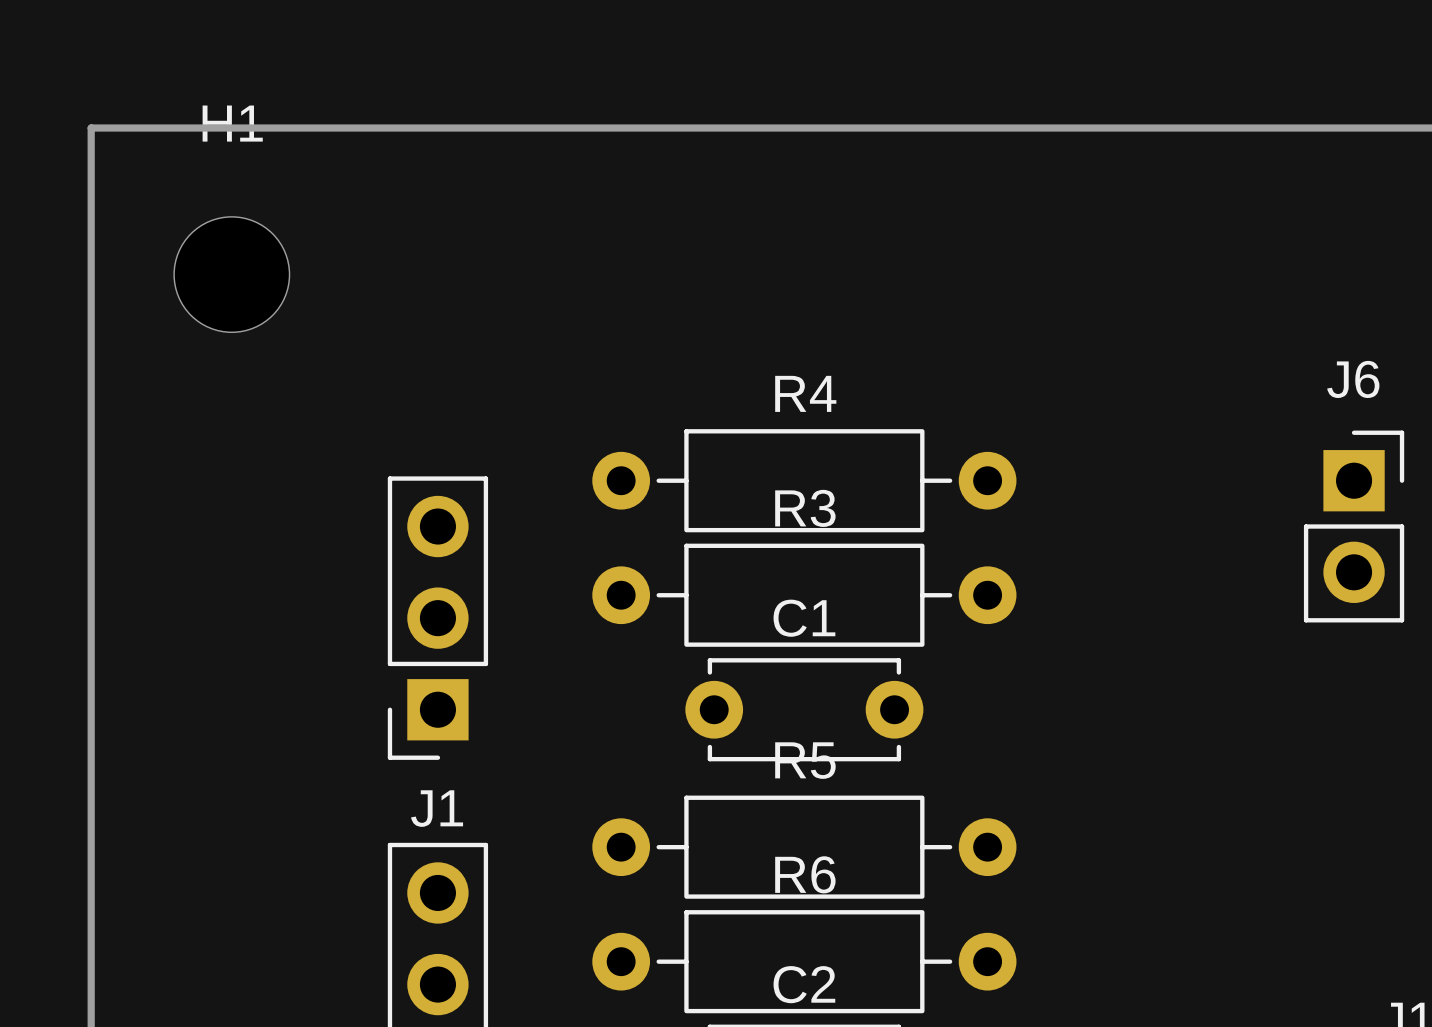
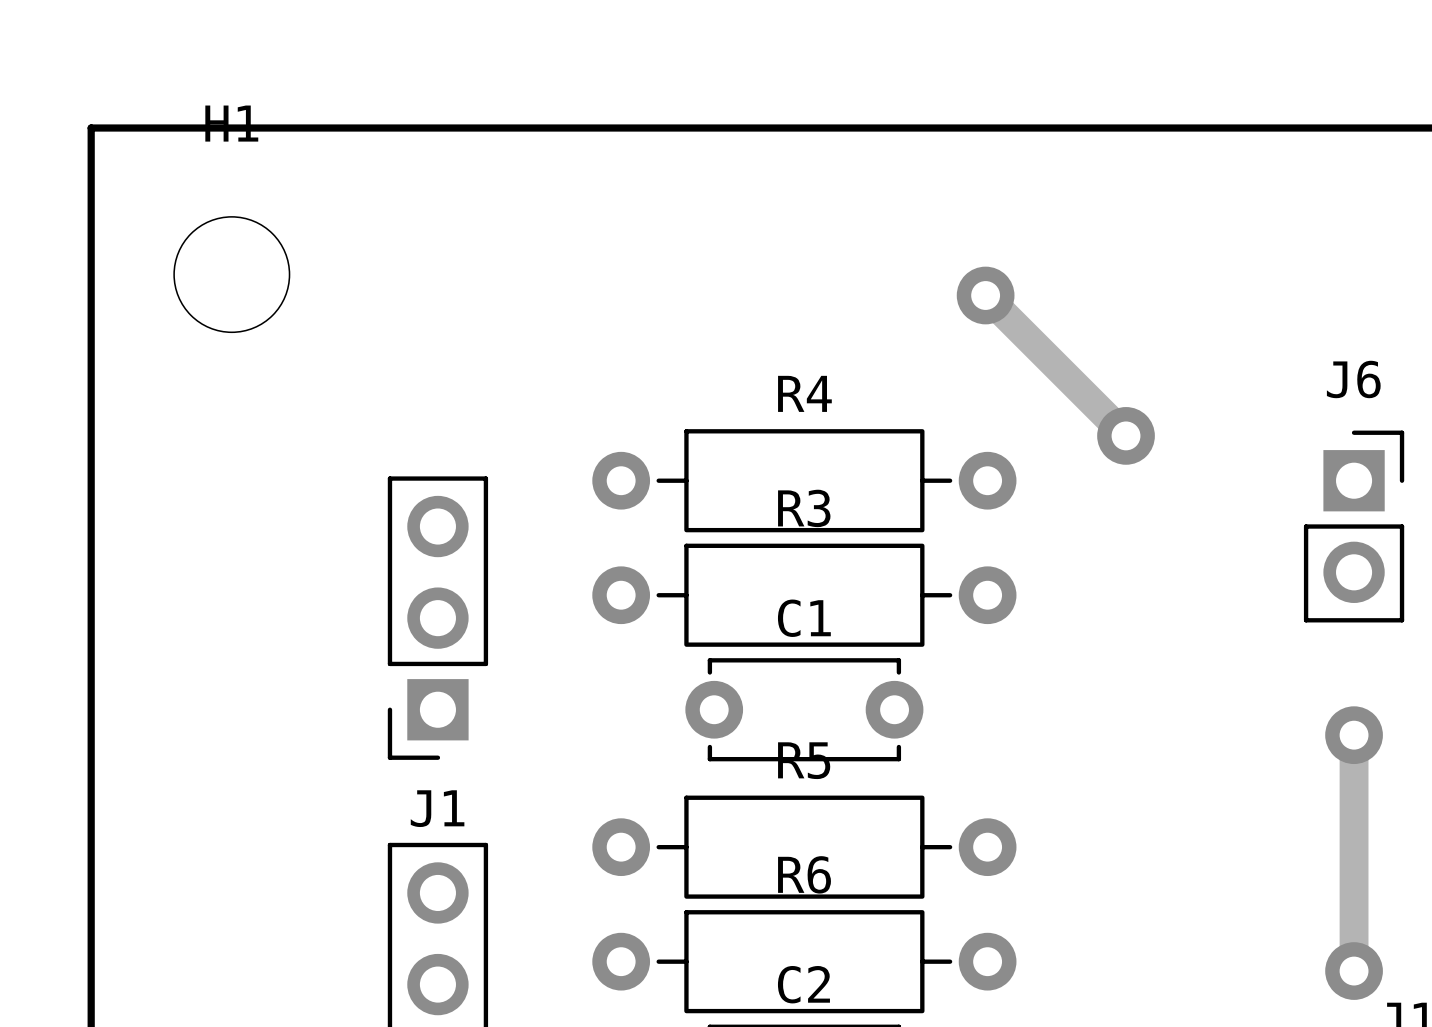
track: none -> (985, 295) (1126, 435)
via: none -> (985, 295)
via: none -> (1126, 435)
track: none -> (1354, 735) (1354, 971)
via: none -> (1354, 735)
via: none -> (1354, 971)

